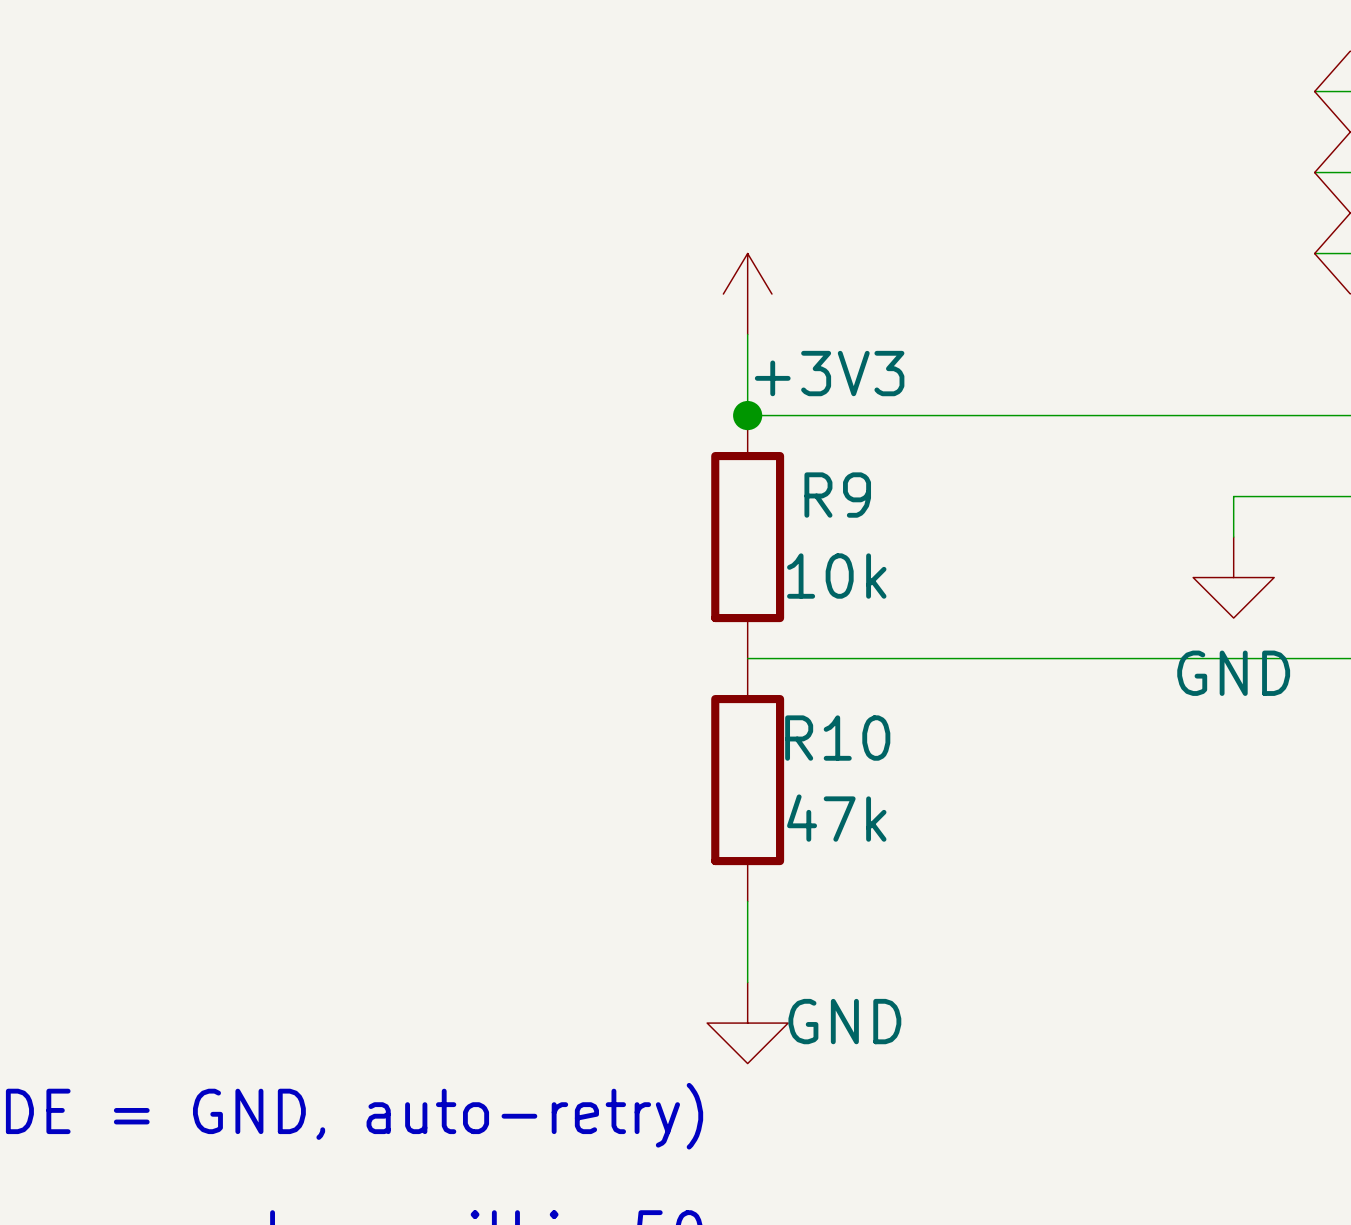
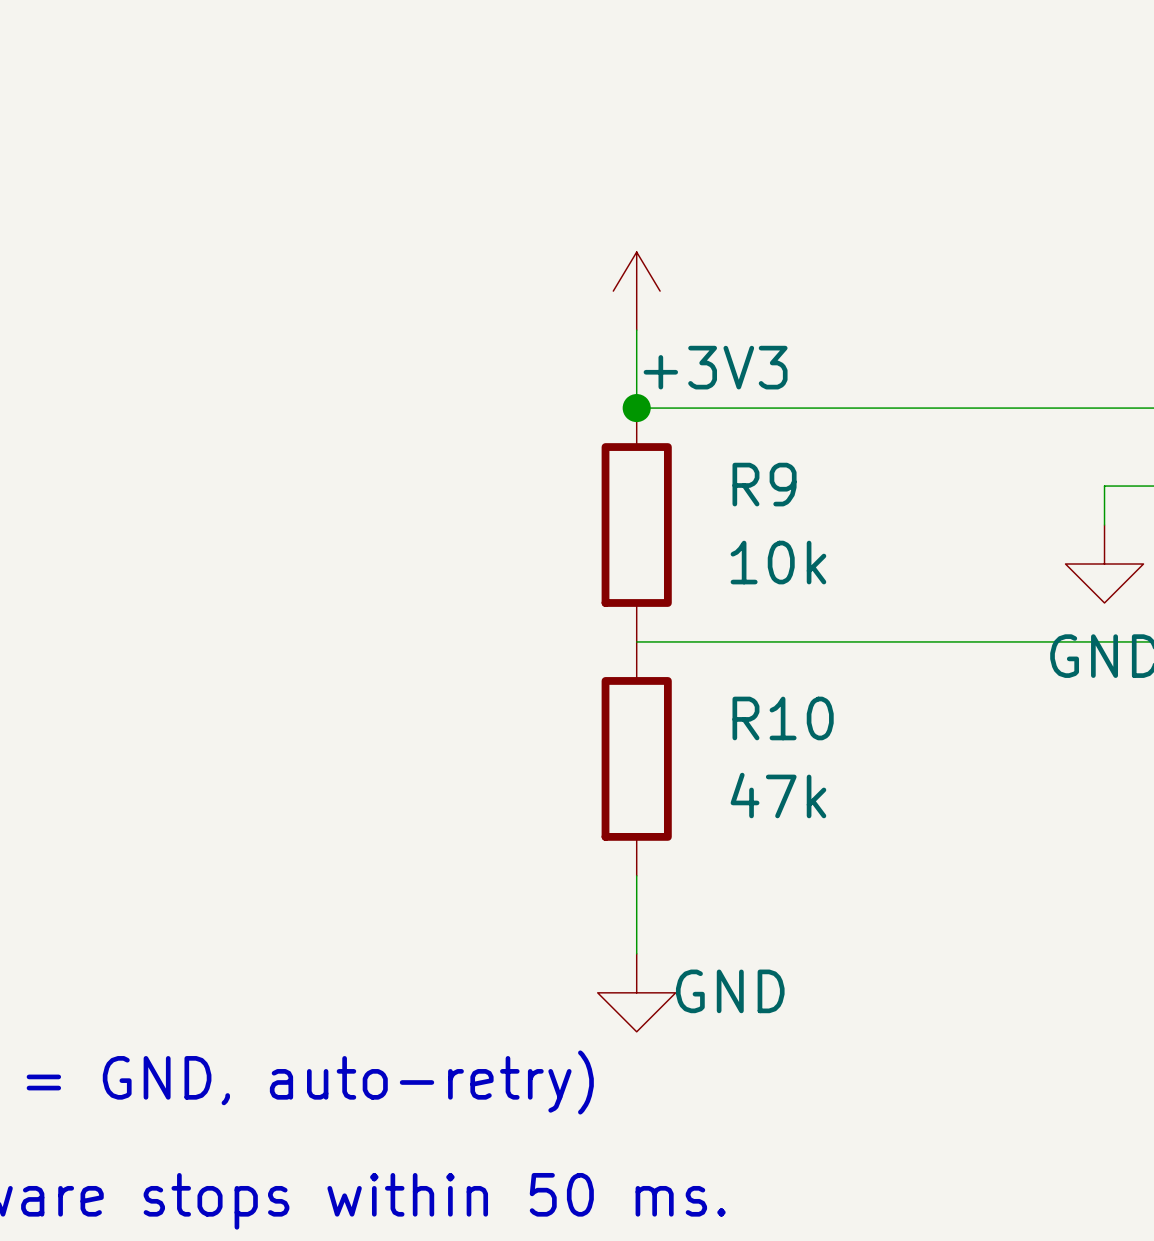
R9 name position: R9 (837, 495) -> R9 (764, 484)
R9 value position: 10k (836, 576) -> 10k (778, 562)
R10 name position: R10 (837, 738) -> R10 (783, 718)
R10 value position: 47k (836, 818) -> 47k (778, 795)

